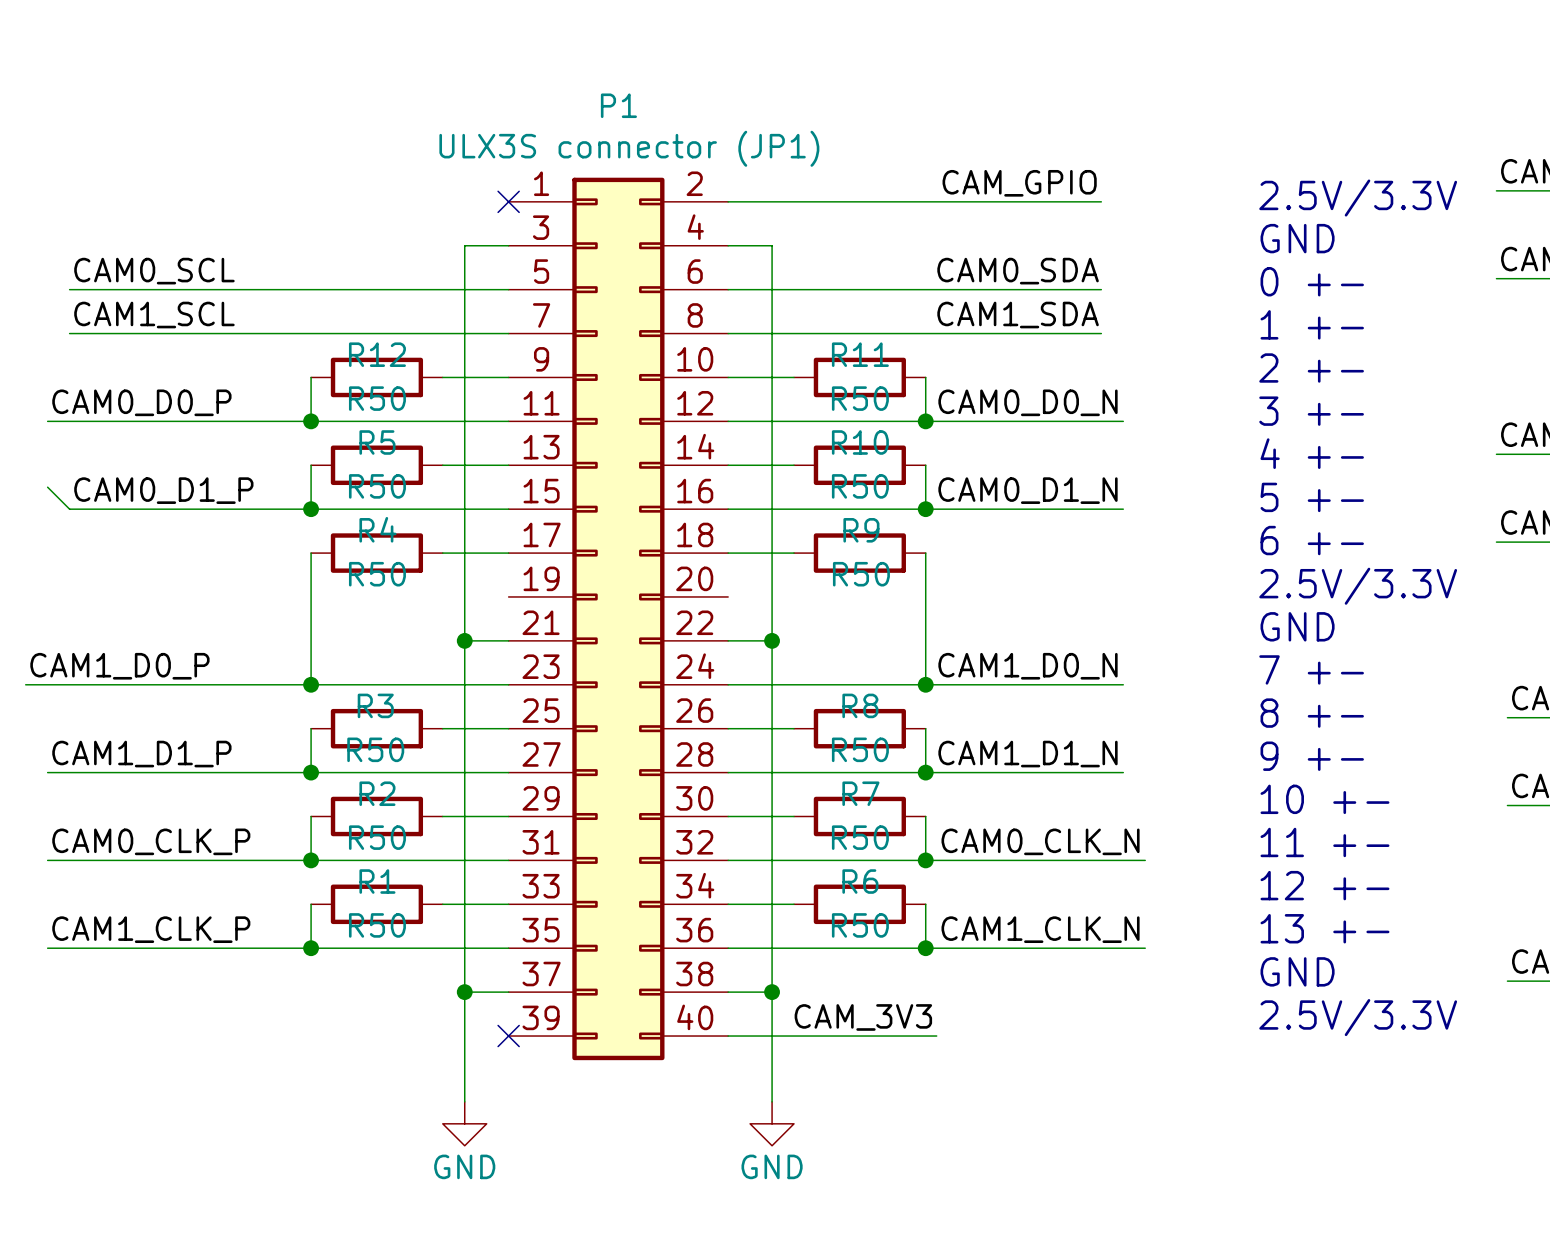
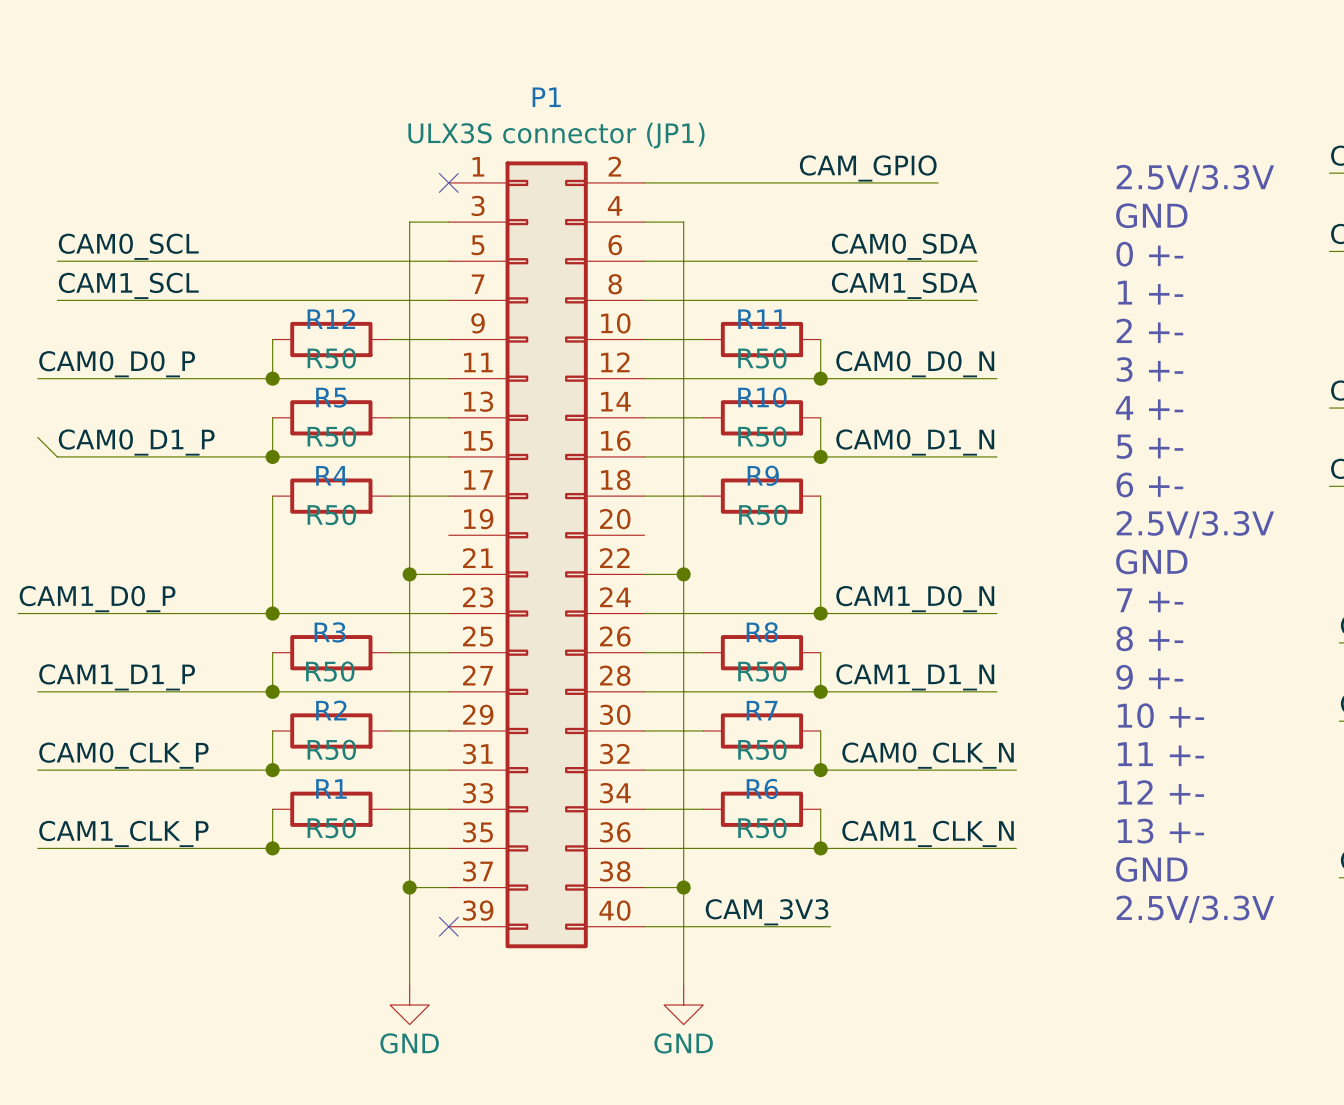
label position: CAM_GPIO (1019, 183) -> CAM_GPIO (868, 168)
wire: (1057, 201) (1101, 201) -> none

